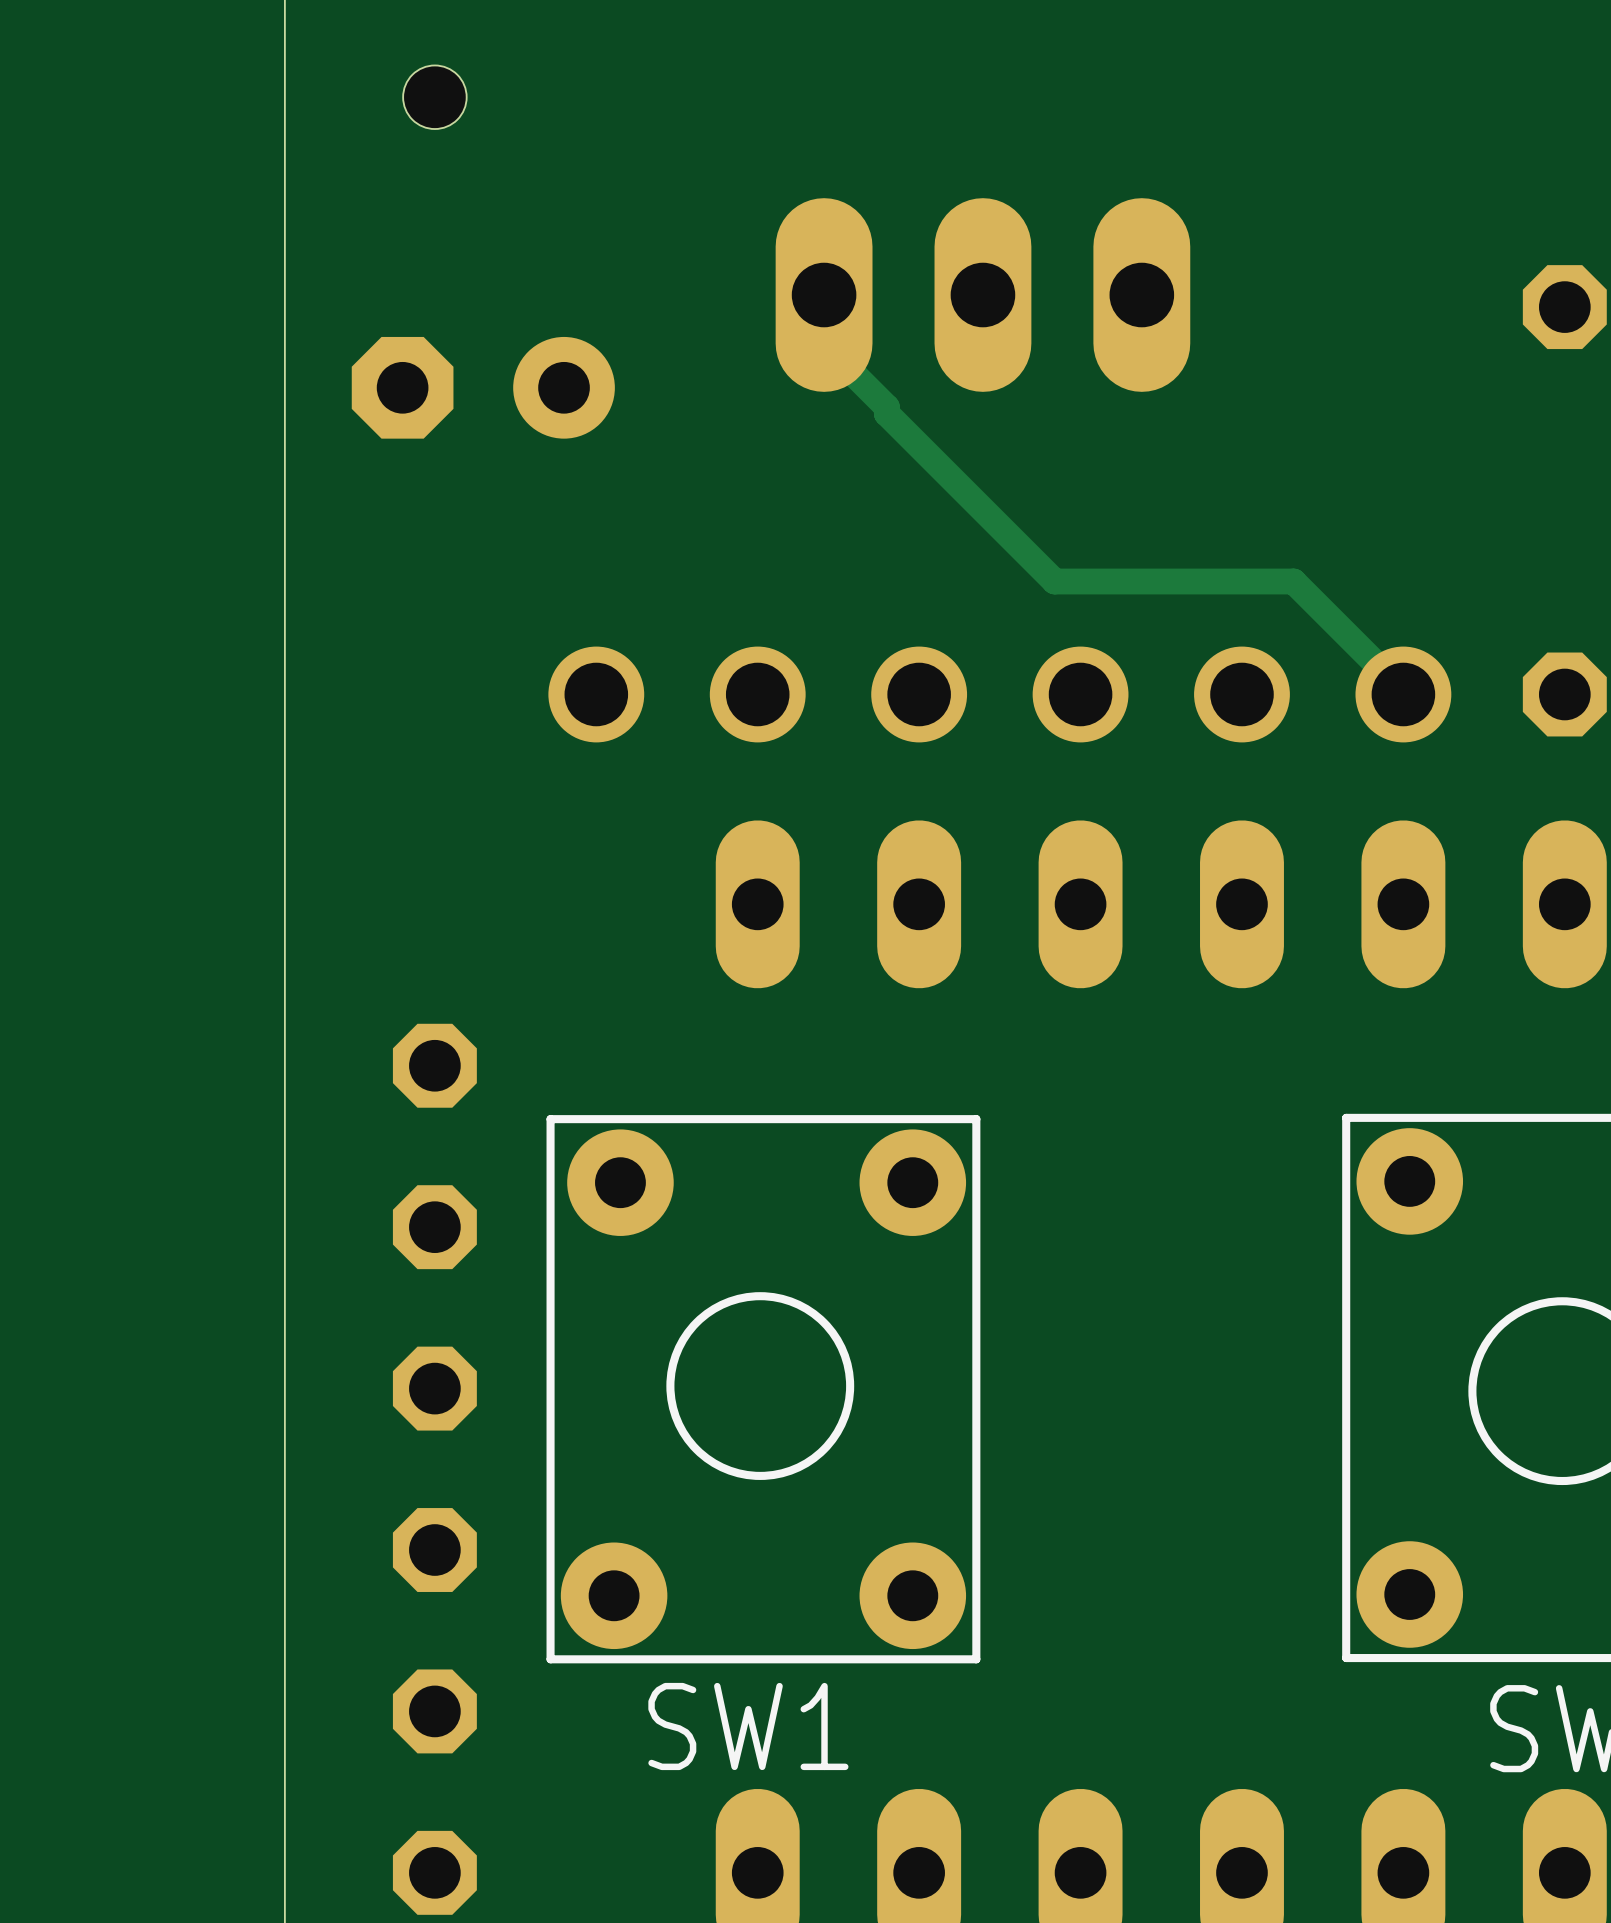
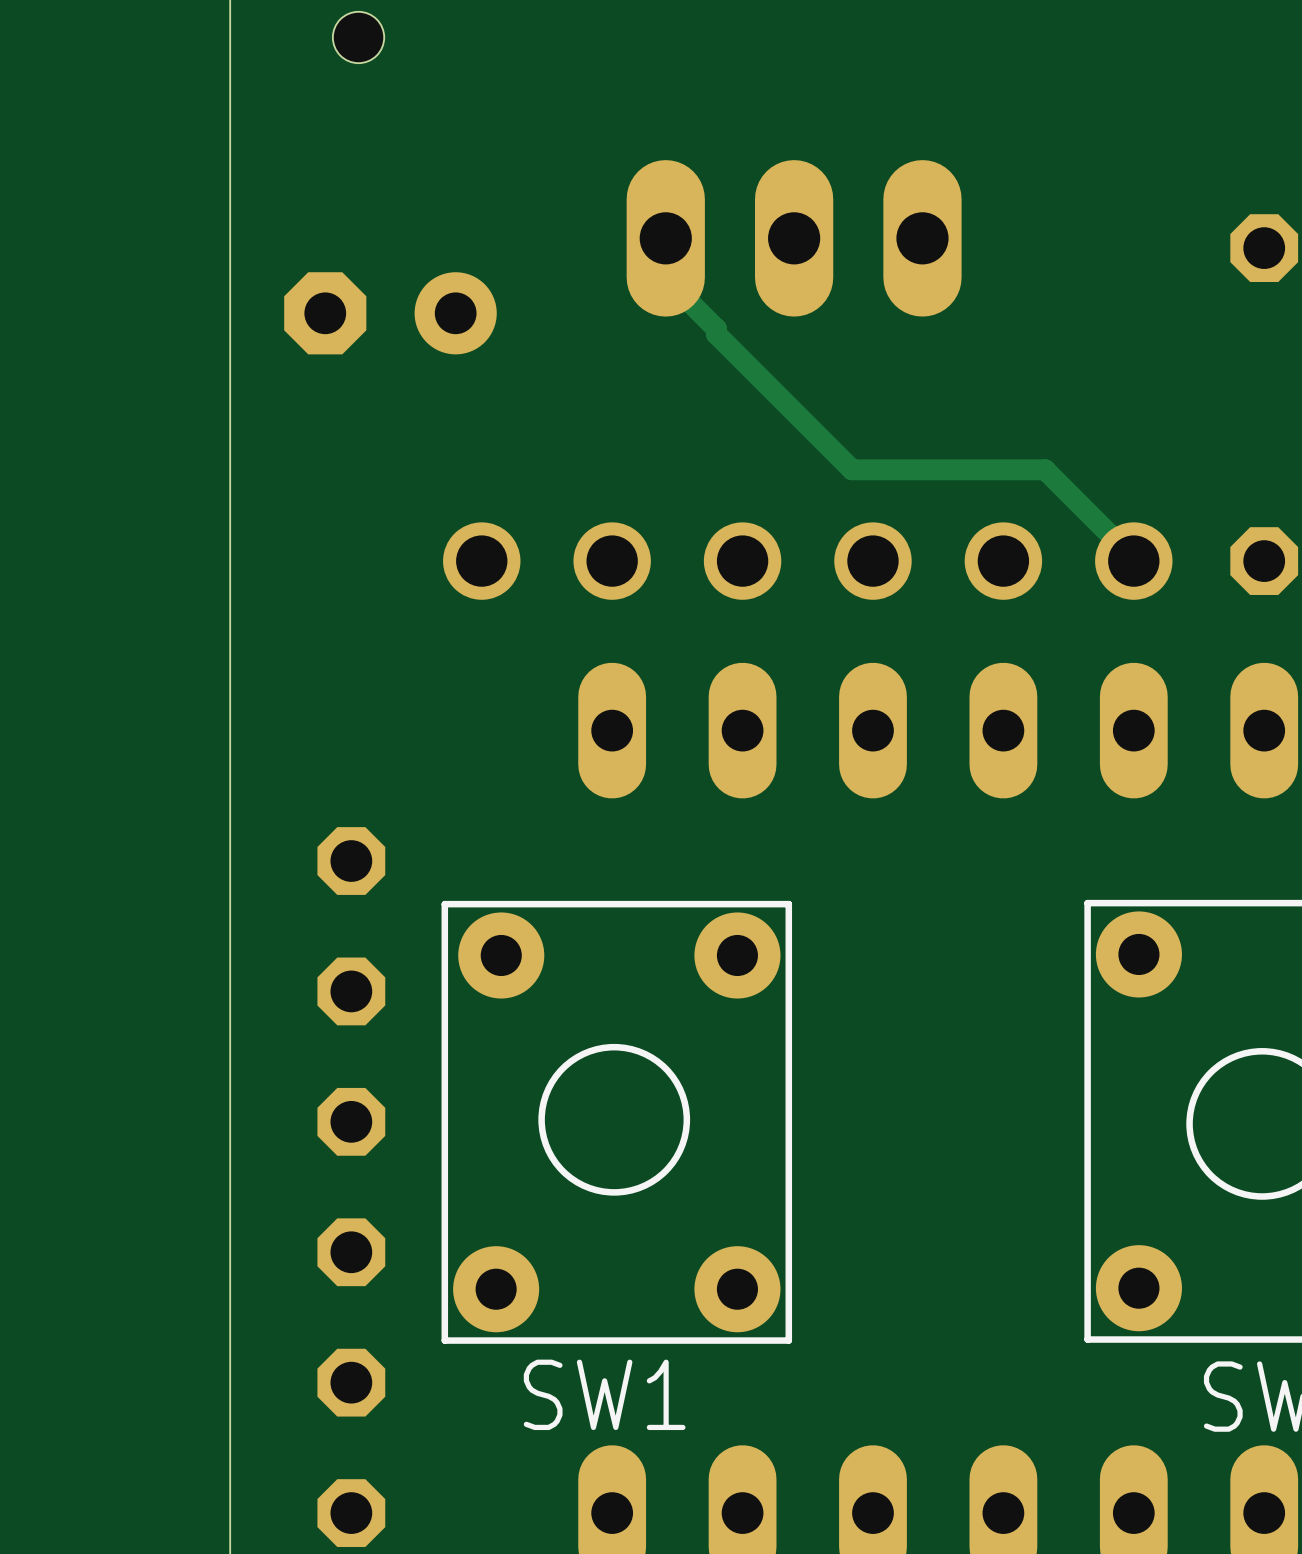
hole position: (434, 97) -> (358, 37)

